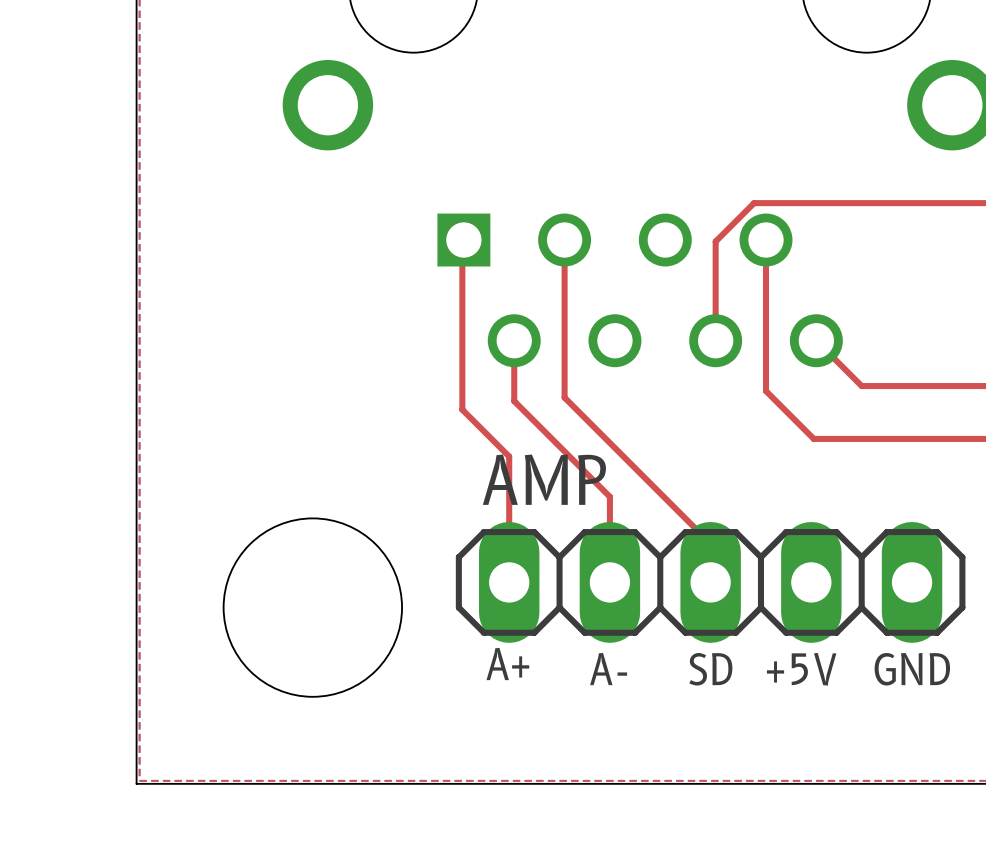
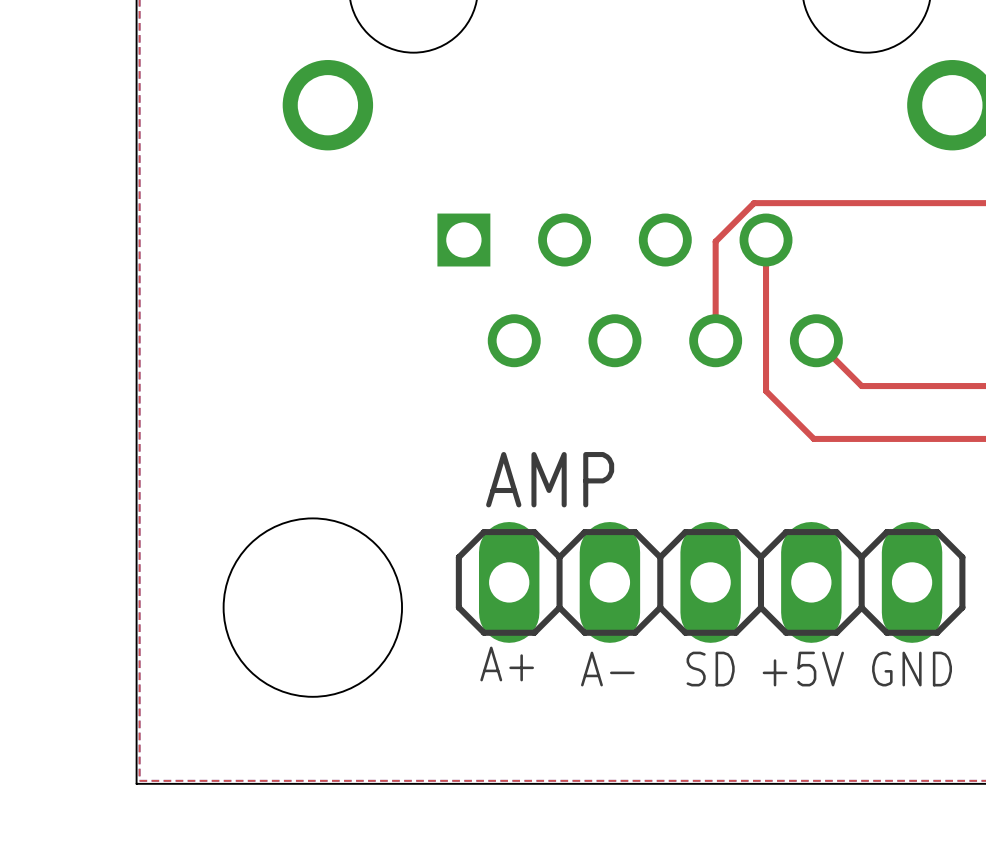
top track: (463, 240) (462, 241) (462, 409) (509, 456) (509, 582) -> none
top track: (564, 240) (564, 397) (710, 543) (710, 582) -> none
top track: (514, 340) (514, 401) (609, 496) (609, 582) -> none

